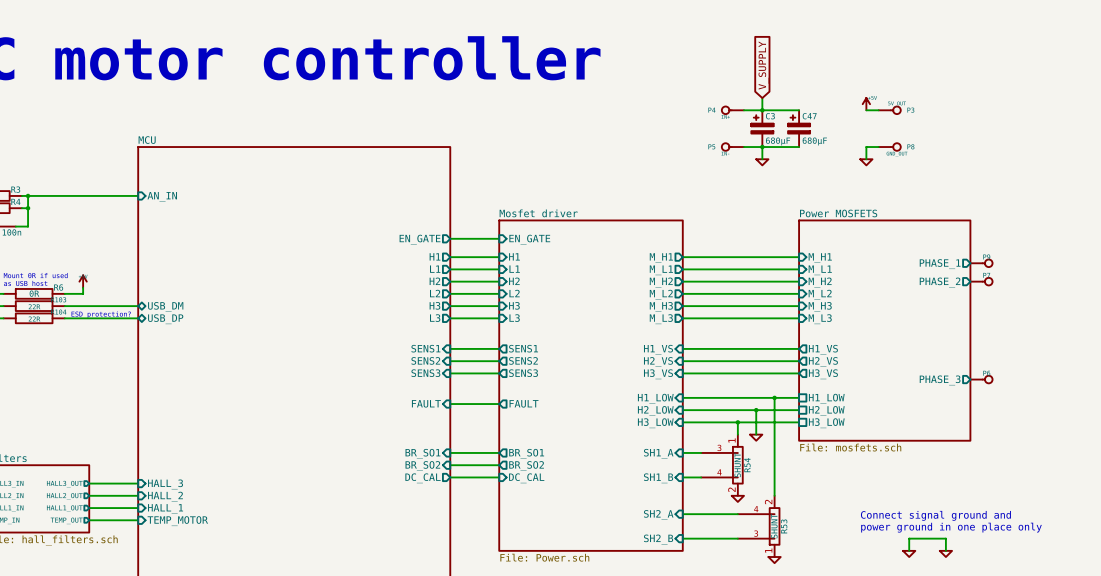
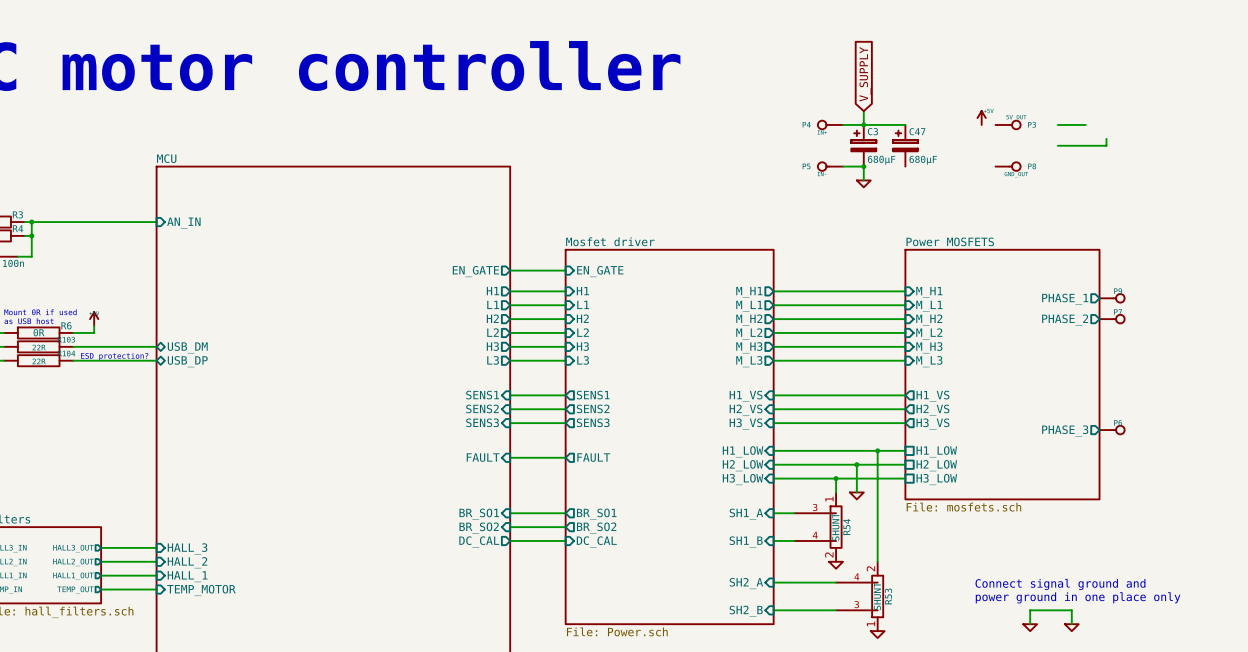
wire: (866, 110) (878, 110) -> none
wire: none -> (1057, 124) (1085, 124)
wire: none -> (1106, 138) (1106, 145) (1057, 145)
wire: (762, 147) (799, 147) -> none
wire: (878, 147) (866, 147) (866, 159) -> none
power symbol: (866, 162) -> none

